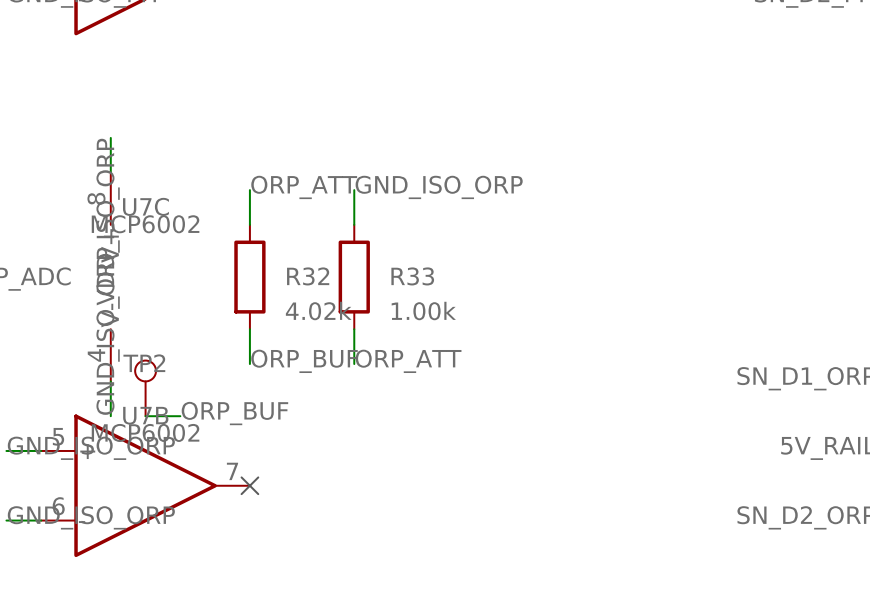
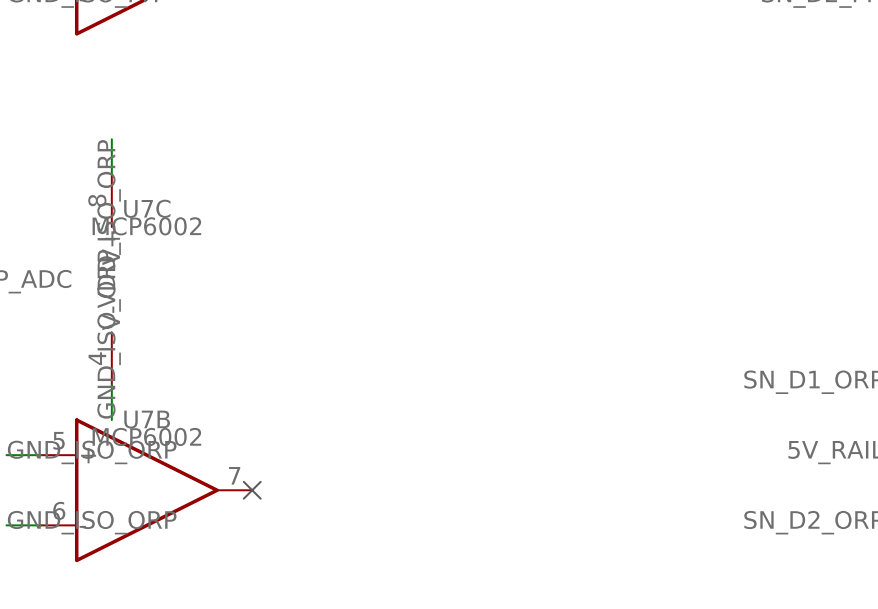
label: ORP_ATT (304, 187) -> none
label: GND_ISO_ORP (439, 187) -> none
wire: (249, 190) (249, 224) -> none
wire: (354, 190) (354, 224) -> none
R32: 4.02k (249, 277) -> none
R33: 1.00k (354, 277) -> none
wire: (249, 329) (249, 364) -> none
wire: (354, 329) (354, 364) -> none
label: ORP_BUF (304, 361) -> none
label: ORP_ATT (408, 361) -> none
TP2: (145, 388) -> none
label: ORP_BUF (234, 413) -> none
wire: (145, 416) (180, 416) -> none

